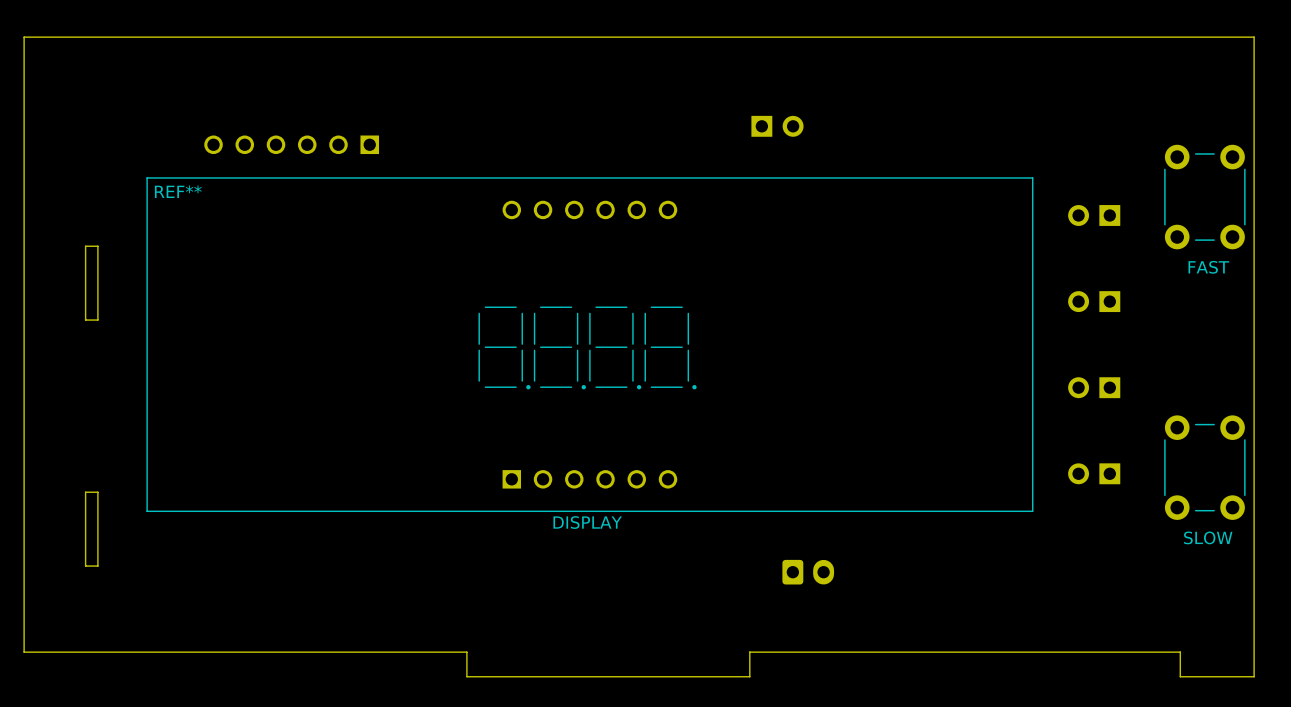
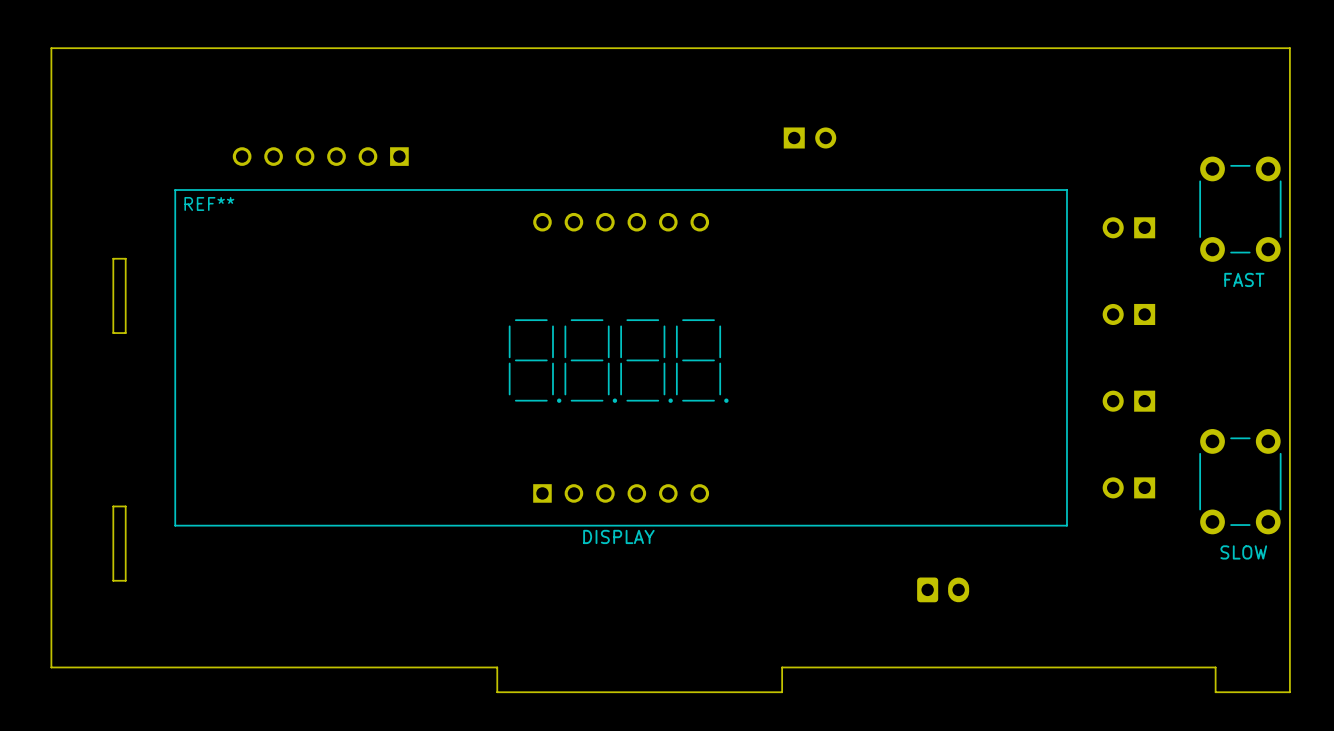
part position: (808, 572) -> (943, 589)

